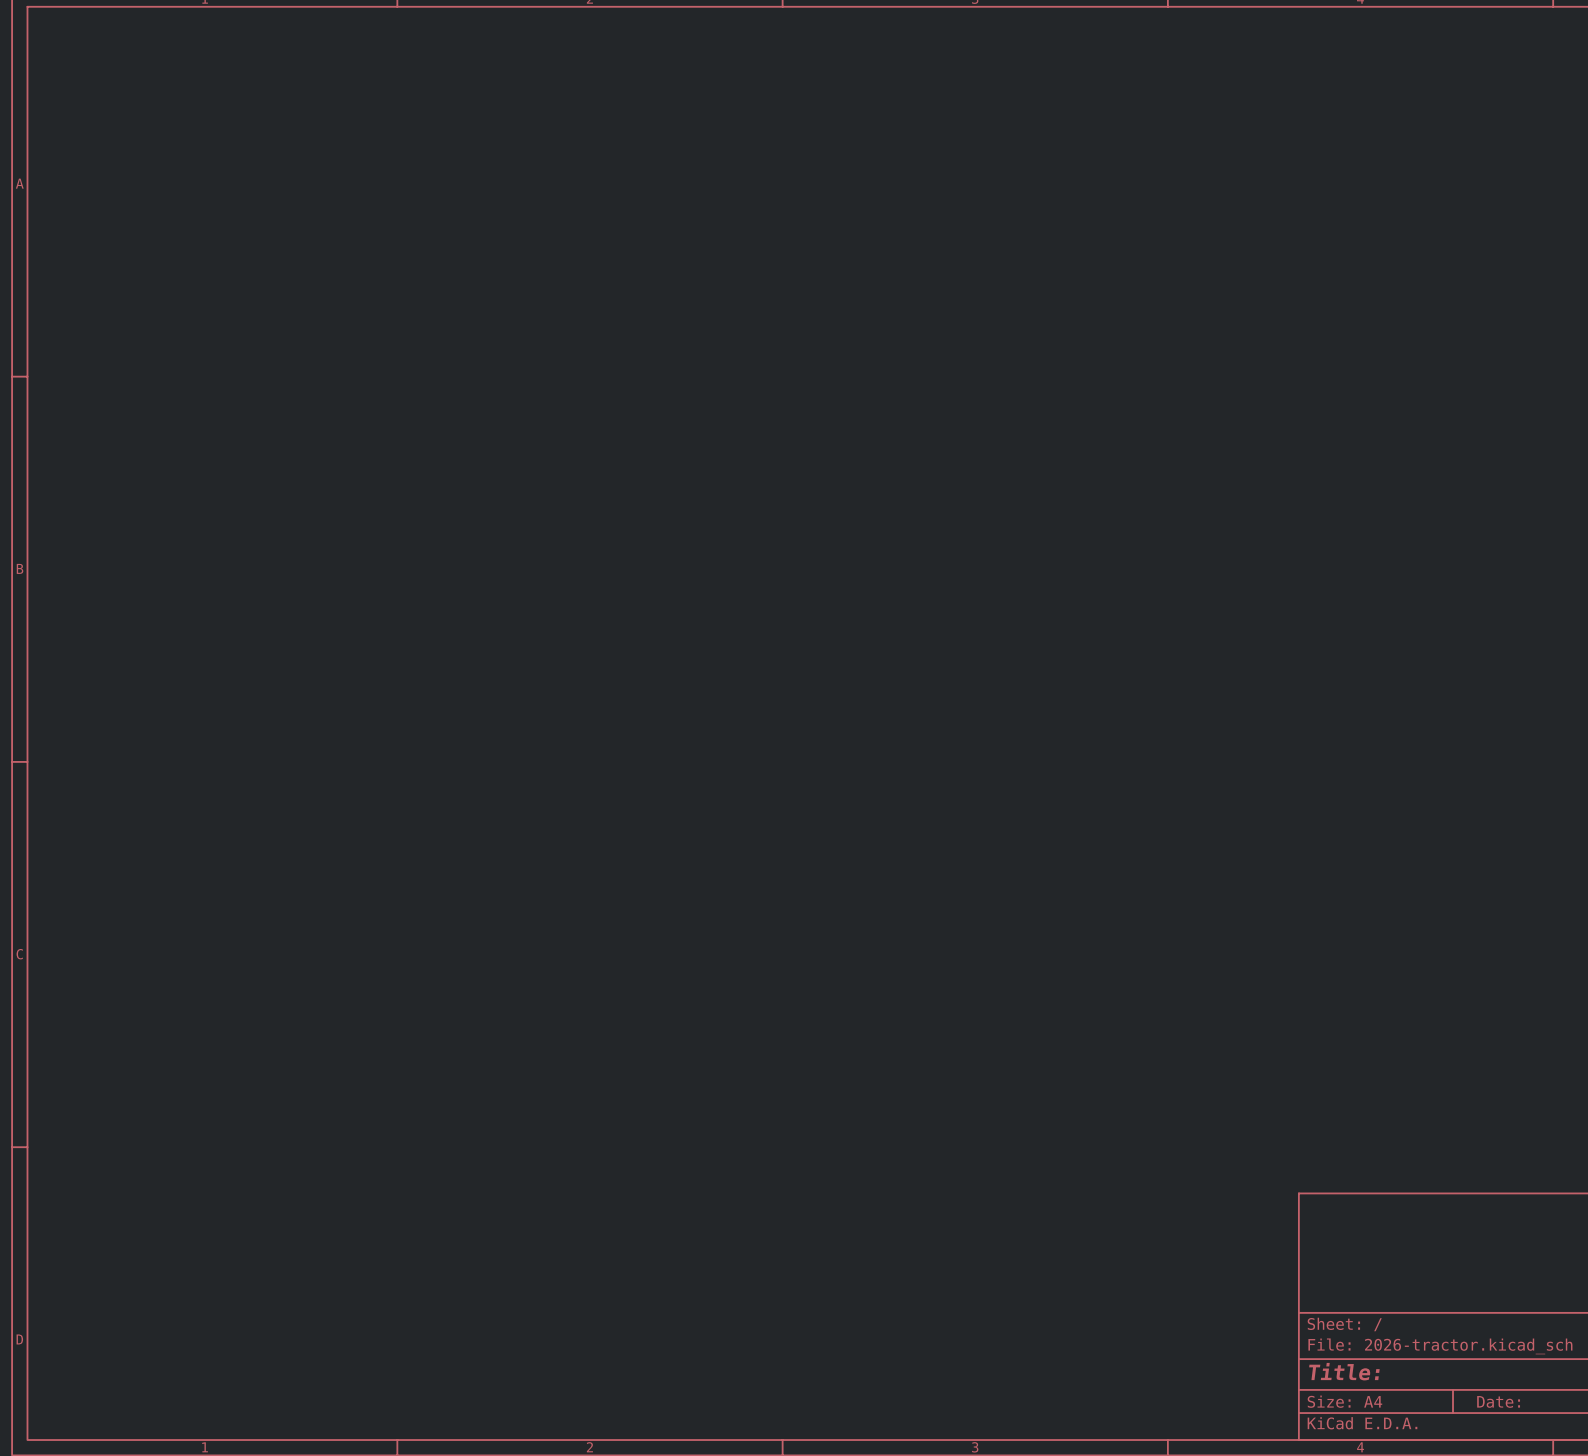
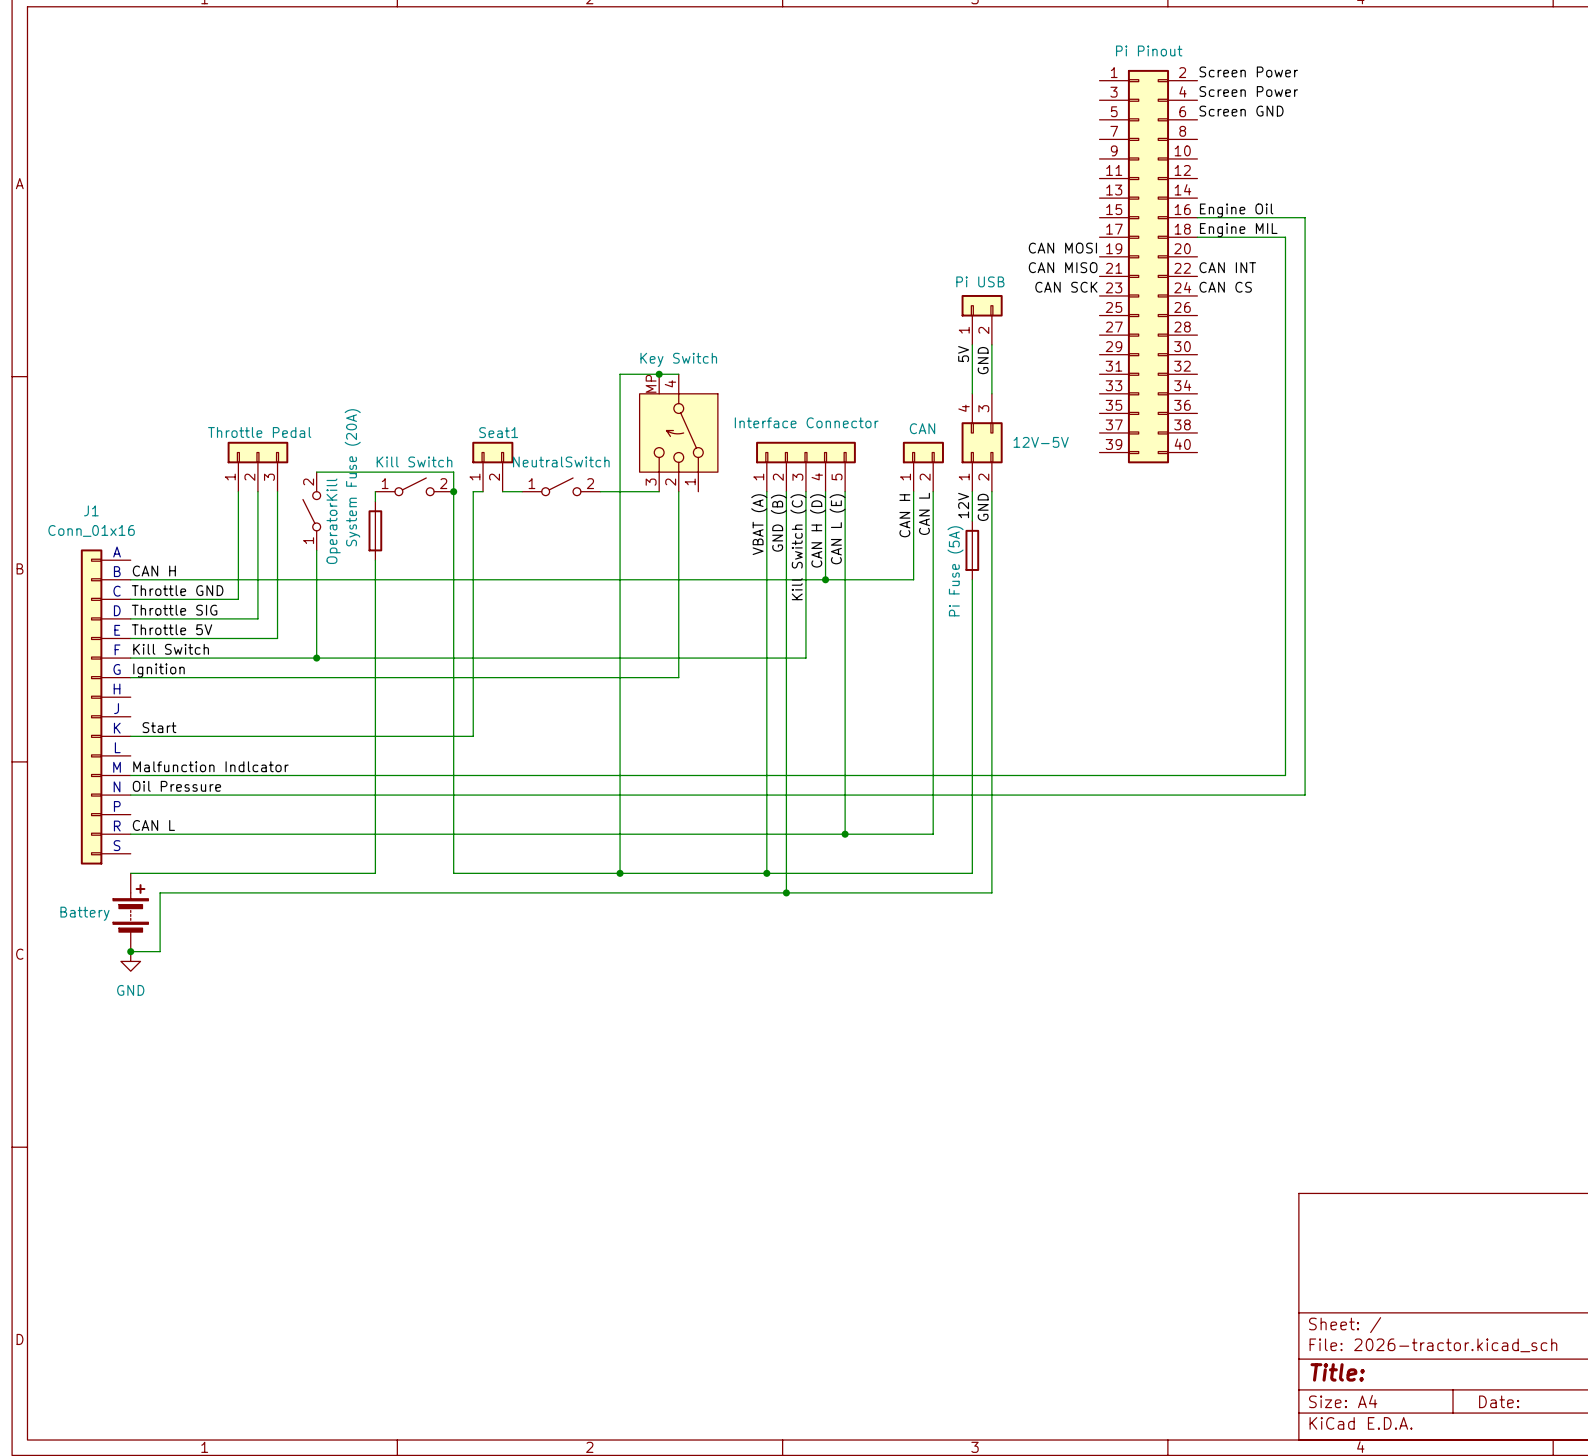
label: none -> Screen Power (1248, 71)
label: none -> Screen Power (1248, 91)
label: none -> Screen GND (1241, 111)
label: none -> Engine Oil (1236, 210)
wire: none -> (1197, 217) (1305, 217) (1305, 795) (130, 795)
label: none -> Engine MIL (1238, 230)
wire: none -> (1197, 237) (1285, 237) (1285, 775) (130, 775)
label: none -> CAN MOSI (1062, 248)
part: none -> Pi Pinout (1148, 266)
label: none -> CAN MISO (1063, 267)
label: none -> CAN INT (1227, 267)
label: none -> CAN SCK (1066, 287)
label: none -> CAN CS (1225, 287)
part: none -> Pi USB (982, 319)
wire: none -> (972, 344) (972, 393)
wire: none -> (991, 344) (991, 393)
label: none -> 5V (963, 354)
label: none -> GND (983, 360)
junction: none -> (659, 374)
wire: none -> (678, 374) (620, 374) (620, 873)
part: none -> Key Switch (678, 432)
part: none -> 12V-5V (982, 442)
part: none -> Throttle Pedal (257, 466)
Seat1: none -> (492, 466)
part: none -> Interface Connector (805, 466)
CAN: none -> (923, 466)
wire: none -> (316, 472) (453, 472) (453, 873) (972, 873) (972, 579)
part: none -> Kill Switch (414, 486)
NeutralSwitch: none -> (561, 486)
wire: none -> (238, 491) (238, 599) (130, 599)
wire: none -> (257, 491) (257, 618) (130, 618)
wire: none -> (277, 491) (277, 638) (130, 638)
wire: none -> (375, 491) (375, 501)
junction: none -> (453, 491)
wire: none -> (483, 491) (473, 491) (473, 736) (130, 736)
wire: none -> (502, 491) (522, 491)
wire: none -> (600, 491) (659, 491)
wire: none -> (678, 491) (678, 677) (130, 677)
wire: none -> (766, 491) (766, 873)
wire: none -> (786, 491) (786, 892)
wire: none -> (805, 491) (805, 658) (130, 658)
wire: none -> (825, 491) (825, 579)
wire: none -> (845, 491) (845, 834)
wire: none -> (913, 491) (913, 579) (130, 579)
wire: none -> (933, 491) (933, 834) (130, 834)
wire: none -> (972, 491) (972, 521)
wire: none -> (991, 491) (991, 892) (160, 892) (160, 951) (130, 951)
label: none -> 12V (963, 505)
label: none -> GND (983, 507)
OperatorKill: none -> (311, 511)
label: none -> CAN H (904, 515)
label: none -> CAN L (924, 513)
label: none -> GND (B) (778, 523)
label: none -> VBAT (A) (759, 524)
label: none -> CAN H (D) (817, 530)
label: none -> CAN L (E) (837, 529)
part: none -> System Fuse (20A) (375, 530)
wire: none -> (316, 550) (316, 658)
part: none -> Pi Fuse (5A) (972, 550)
text: none -> A (117, 552)
label: none -> Kill Switch (C) (798, 547)
wire: none -> (375, 560) (375, 873) (130, 873)
text: none -> B (117, 571)
label: none -> CAN H (154, 571)
junction: none -> (825, 579)
label: none -> Throttle GND (177, 590)
text: none -> C (117, 591)
text: none -> D (117, 610)
label: none -> Throttle SIG (174, 610)
label: none -> Throttle 5V (172, 629)
text: none -> E (117, 630)
text: none -> F (117, 649)
label: none -> Kill Switch (171, 649)
junction: none -> (316, 658)
text: none -> G (117, 669)
label: none -> Ignition (159, 670)
text: none -> H (117, 689)
J1: none -> Conn_01x16 (105, 706)
text: none -> J (116, 708)
label: none -> Start (159, 727)
text: none -> K (117, 728)
text: none -> L (117, 747)
label: none -> Malfunction Indlcator (210, 766)
text: none -> M (117, 767)
text: none -> N (117, 786)
label: none -> Oil Pressure (176, 786)
text: none -> P (117, 806)
label: none -> CAN L (153, 825)
text: none -> R (117, 826)
junction: none -> (845, 834)
text: none -> S (117, 845)
junction: none -> (620, 873)
junction: none -> (766, 873)
junction: none -> (786, 892)
part: none -> Battery (130, 912)
junction: none -> (130, 951)
power symbol: none -> GND (130, 961)

